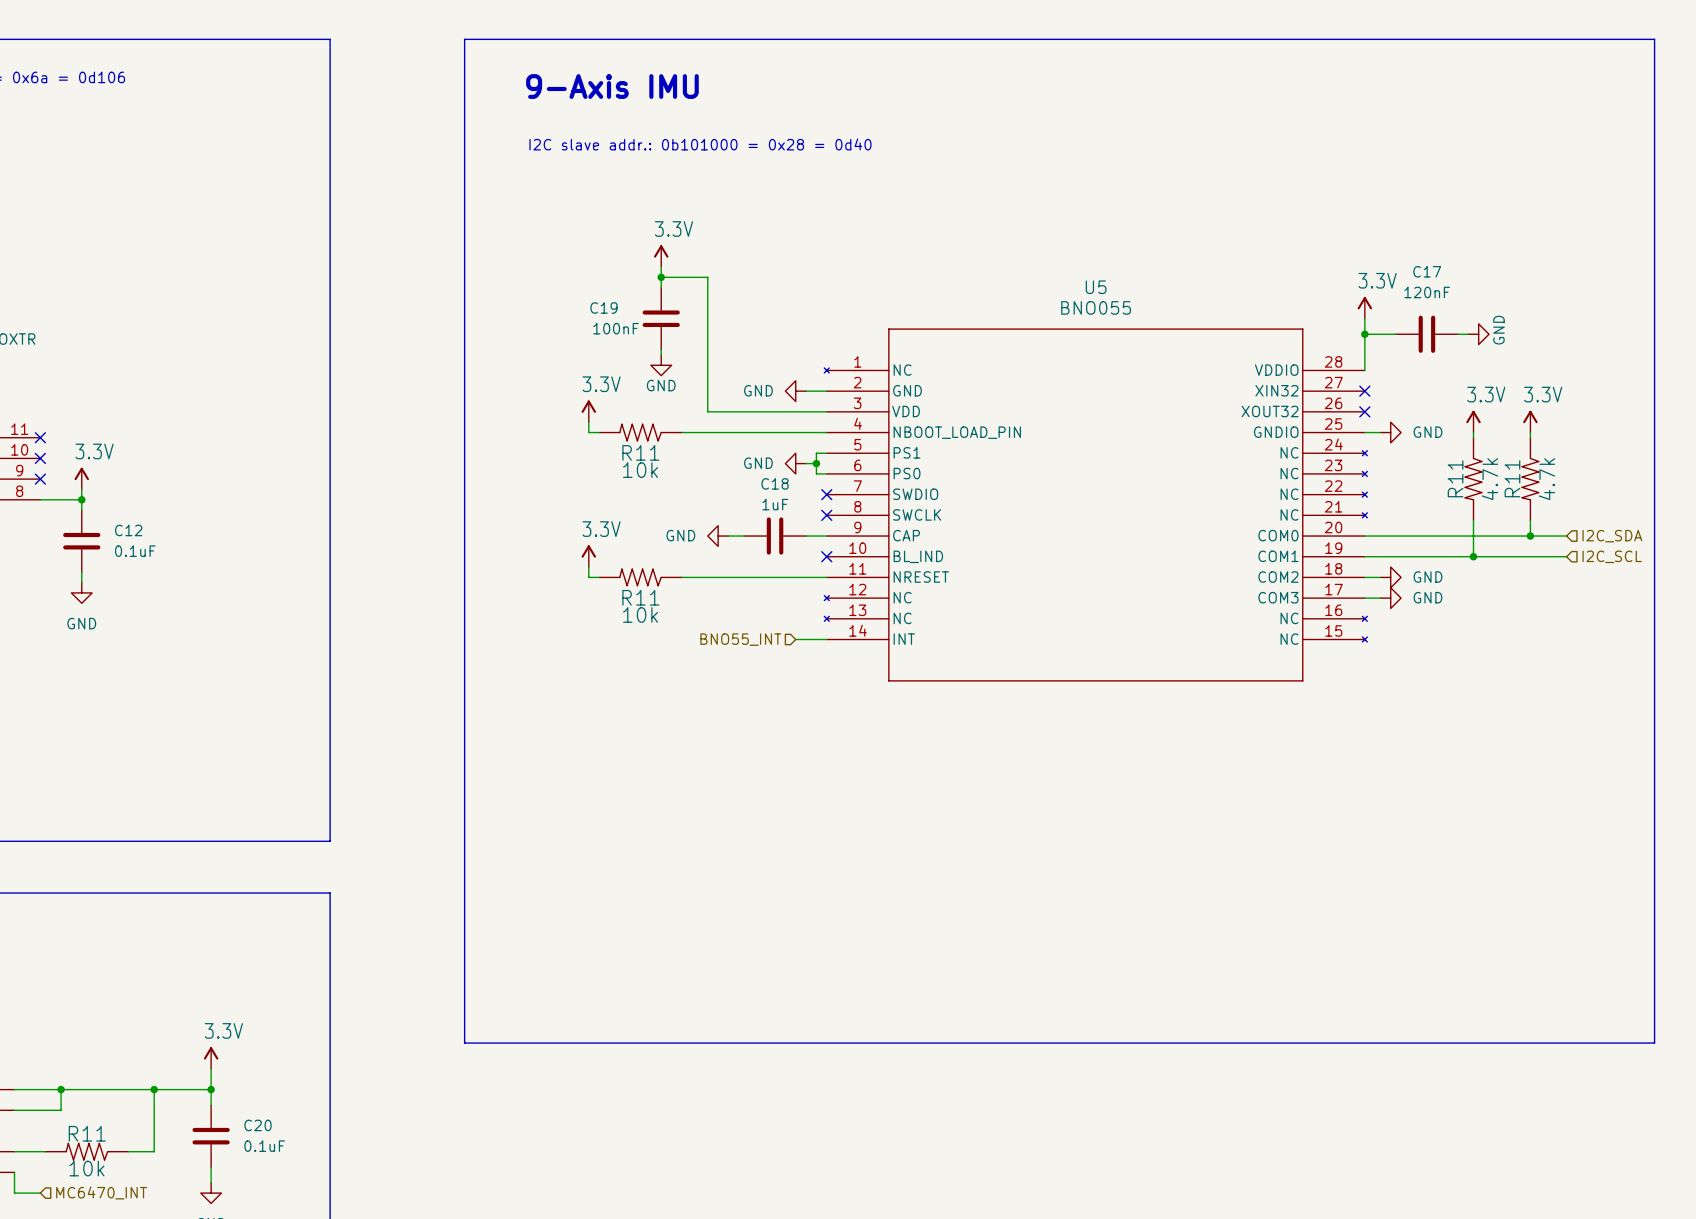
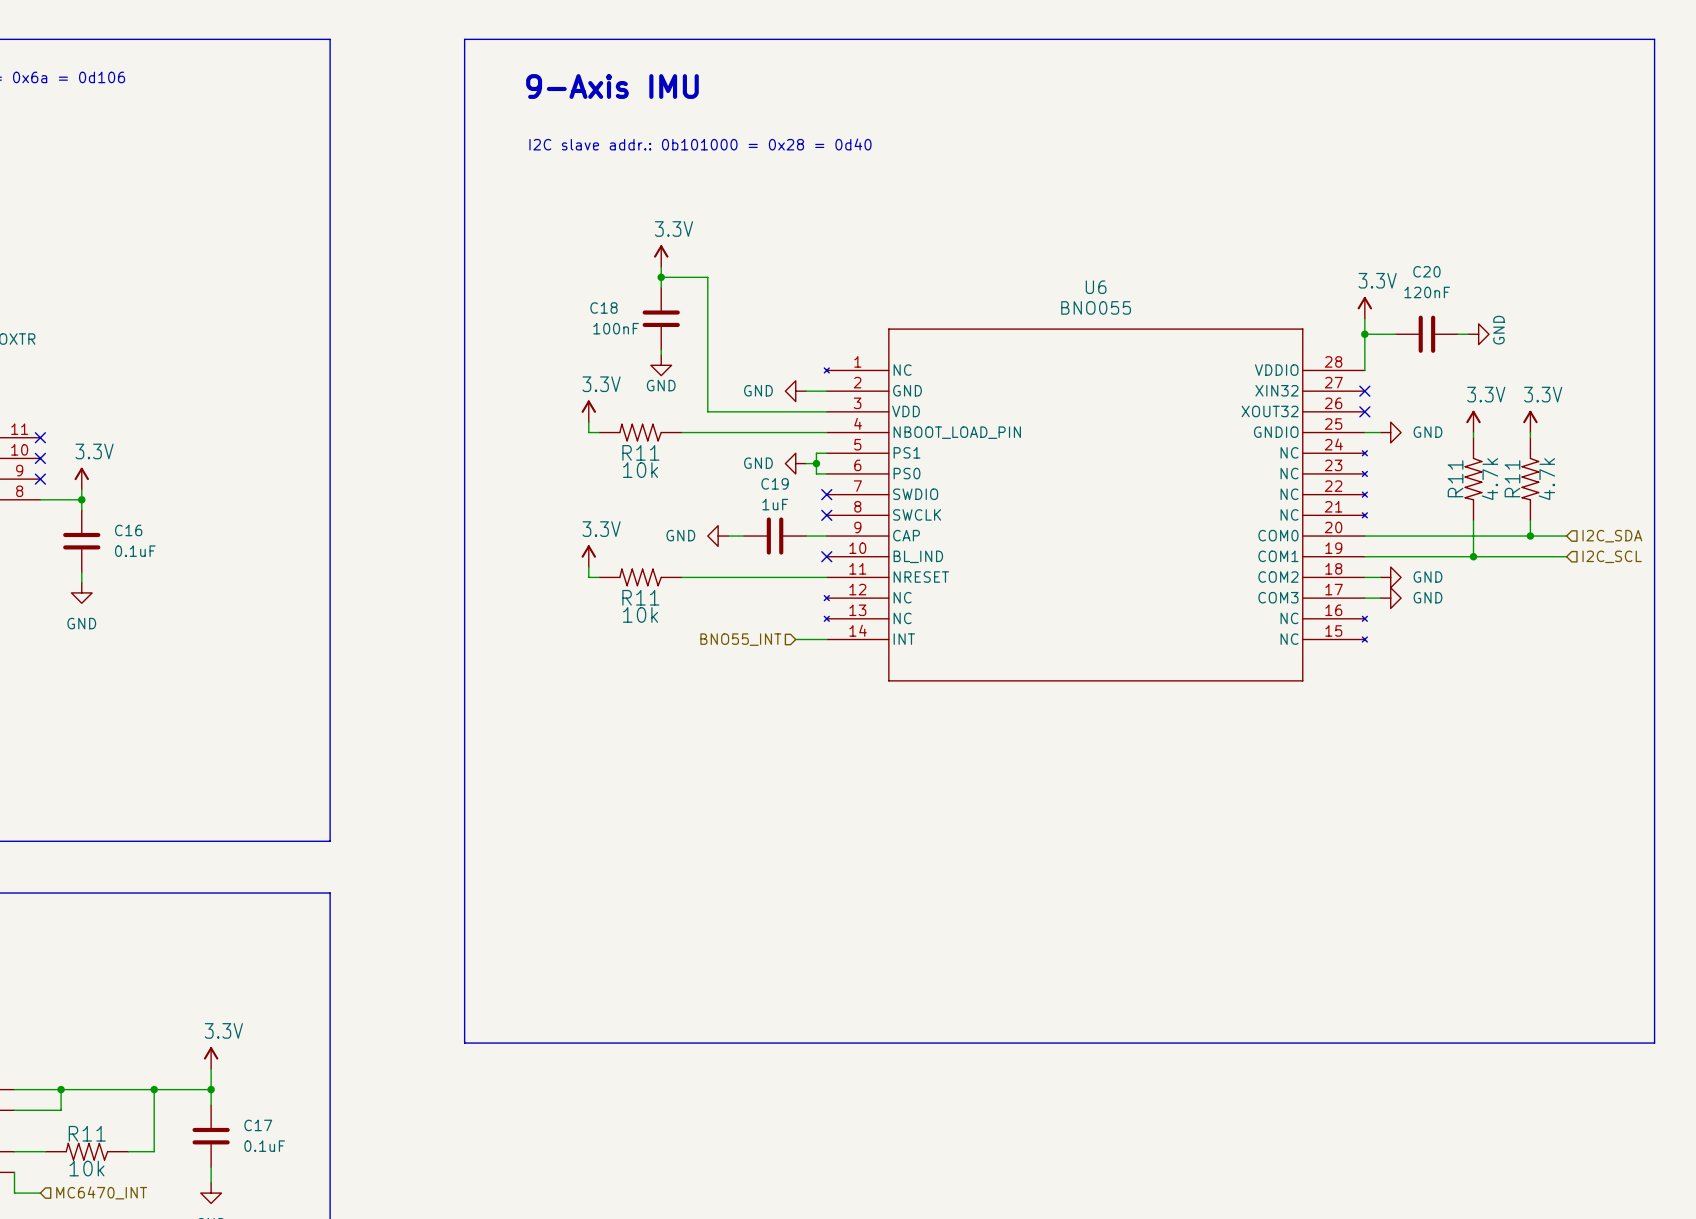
C17 name: C17 (1427, 271) -> C20 (1426, 271)
U5 name: U5 (1096, 287) -> U6 (1096, 287)
C19 name: C19 (603, 307) -> C18 (603, 307)
C18 name: C18 (775, 483) -> C19 (775, 483)
C12 name: C12 (128, 530) -> C16 (128, 530)
C20 name: C20 (258, 1125) -> C17 (258, 1125)

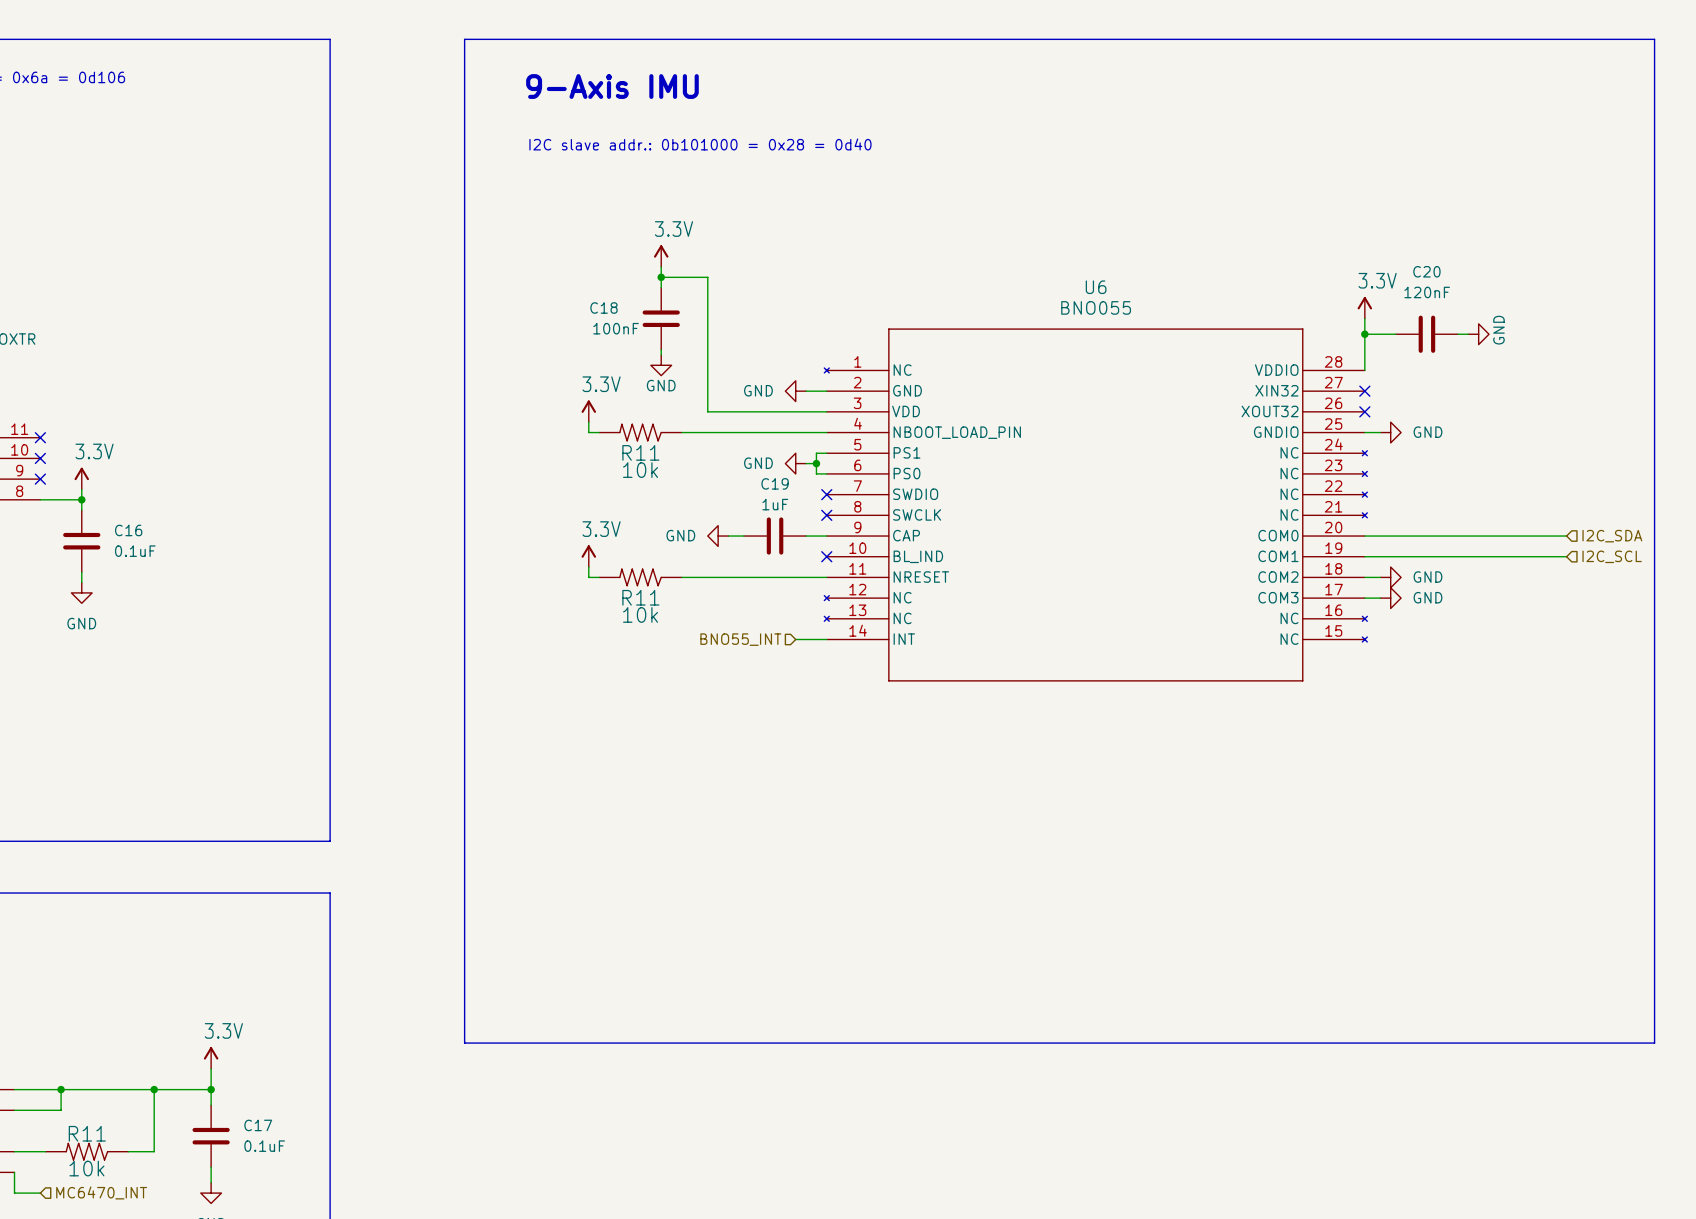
power symbol: 3.3V (1473, 421) -> none
power symbol: 3.3V (1530, 421) -> none
wire: (1473, 432) (1473, 437) -> none
wire: (1530, 432) (1530, 437) -> none
R11: 4.7k (1473, 479) -> none
R11: 4.7k (1530, 479) -> none
wire: (1473, 520) (1473, 556) -> none
wire: (1530, 520) (1530, 536) -> none
junction: (1530, 536) -> none
junction: (1473, 556) -> none

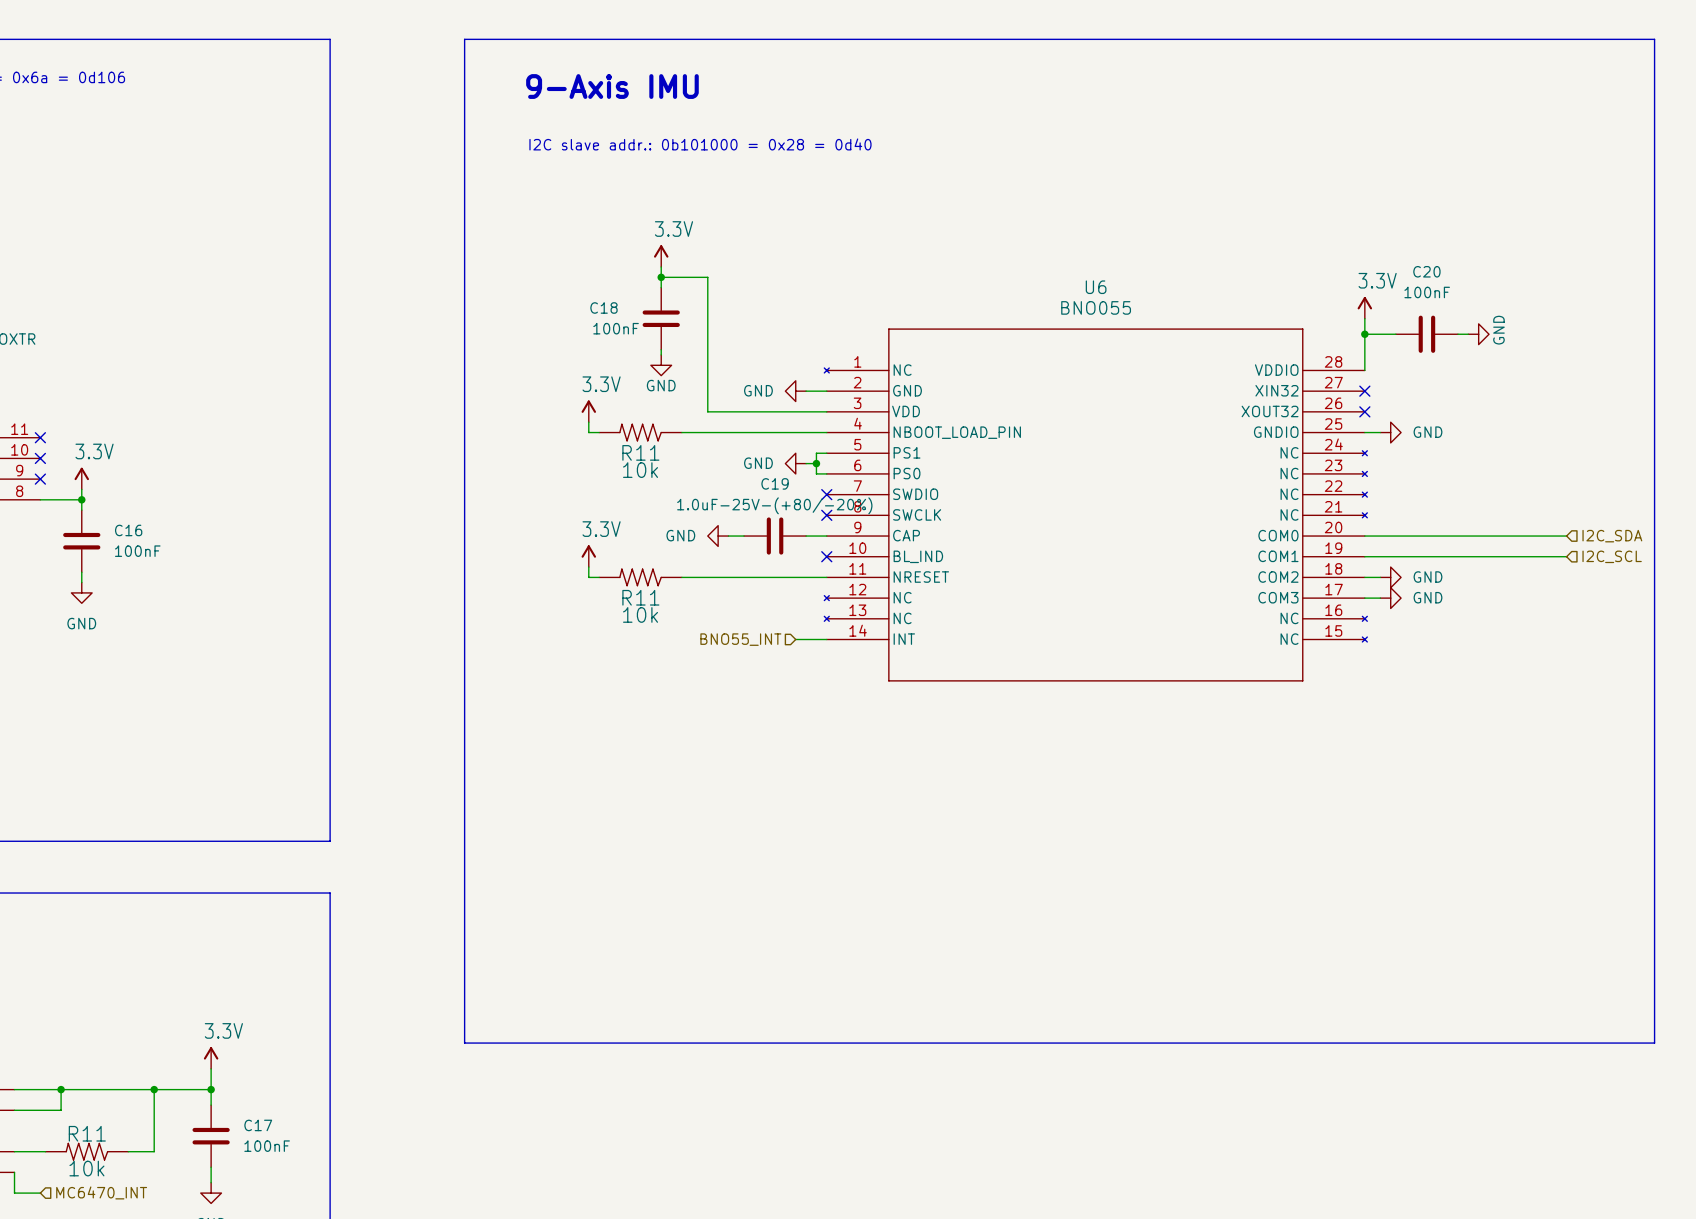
C20 value: 120nF (1427, 292) -> 100nF (1427, 292)
C19 value: 1uF (775, 504) -> 1.0uF-25V-(+80/-20%) (774, 505)
C16 value: 0.1uF (135, 551) -> 100nF (137, 551)
C17 value: 0.1uF (264, 1146) -> 100nF (267, 1146)

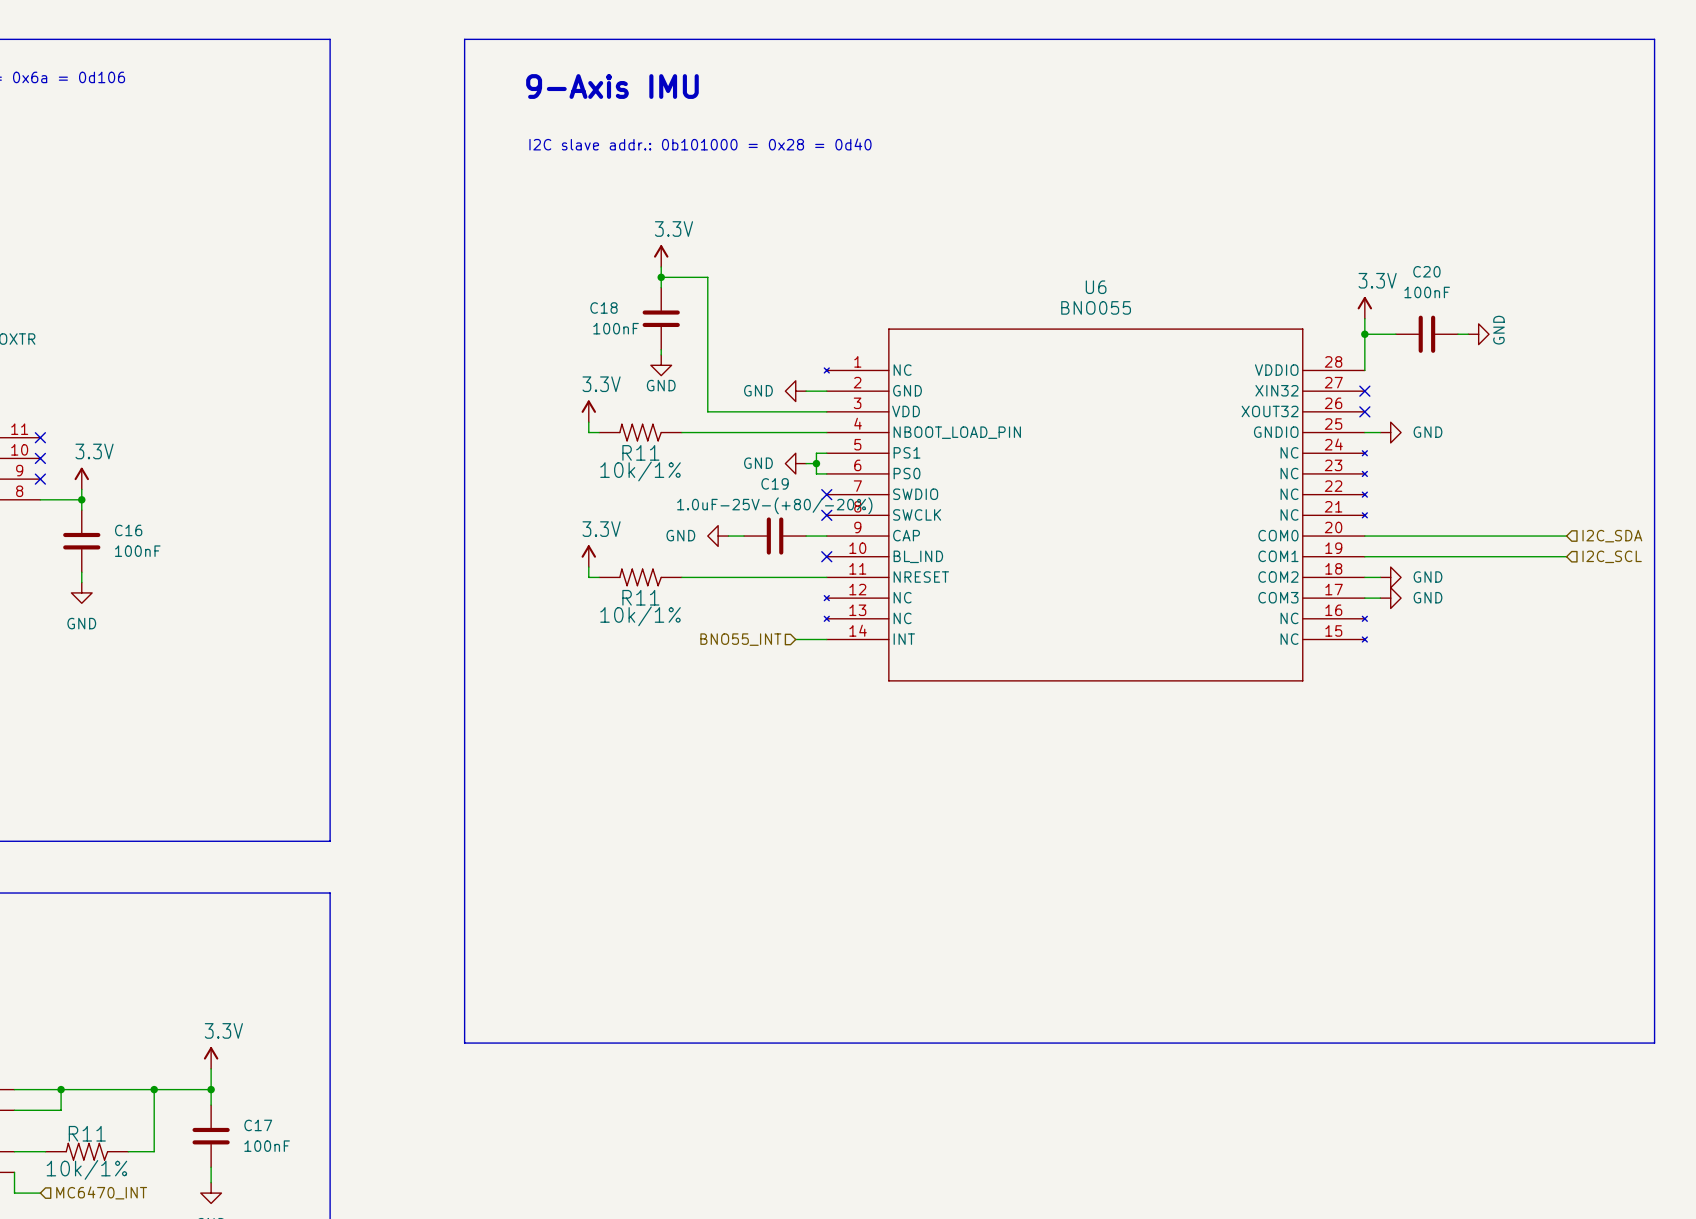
R11 value: 10k (640, 470) -> 10k/1% (640, 471)
R11 value: 10k (640, 614) -> 10k/1% (640, 616)
R11 value: 10k (86, 1168) -> 10k/1% (86, 1169)

